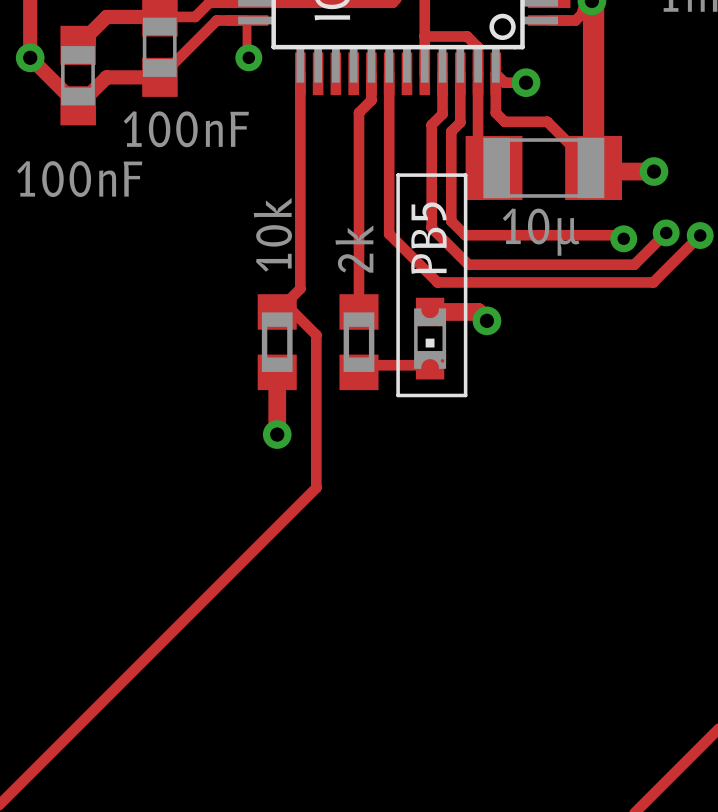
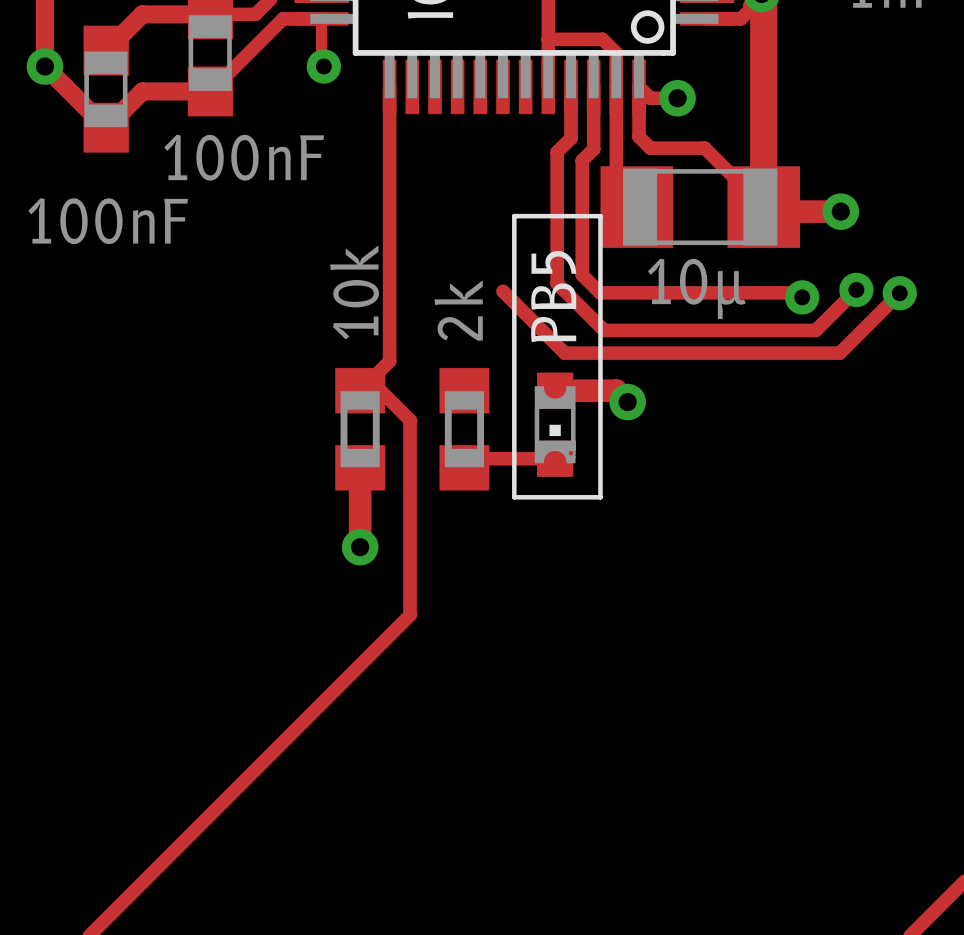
track: (371, 73) (371, 100) (358, 112) (358, 311) -> none
track: (389, 73) (389, 234) -> none

